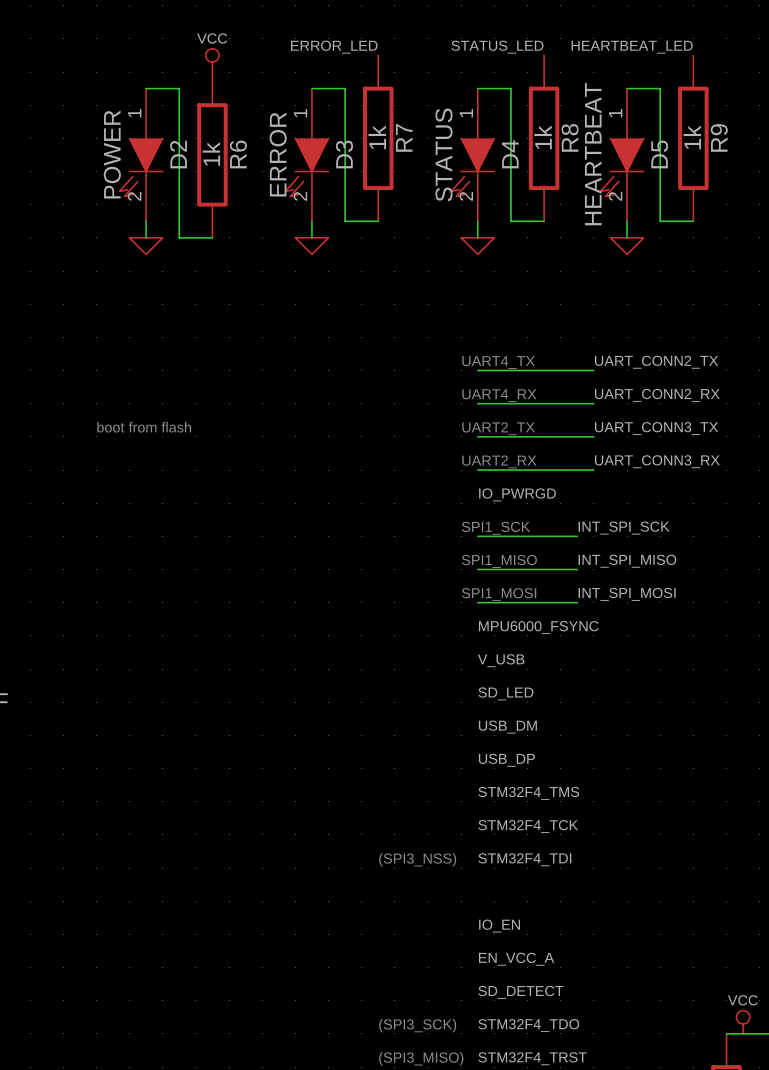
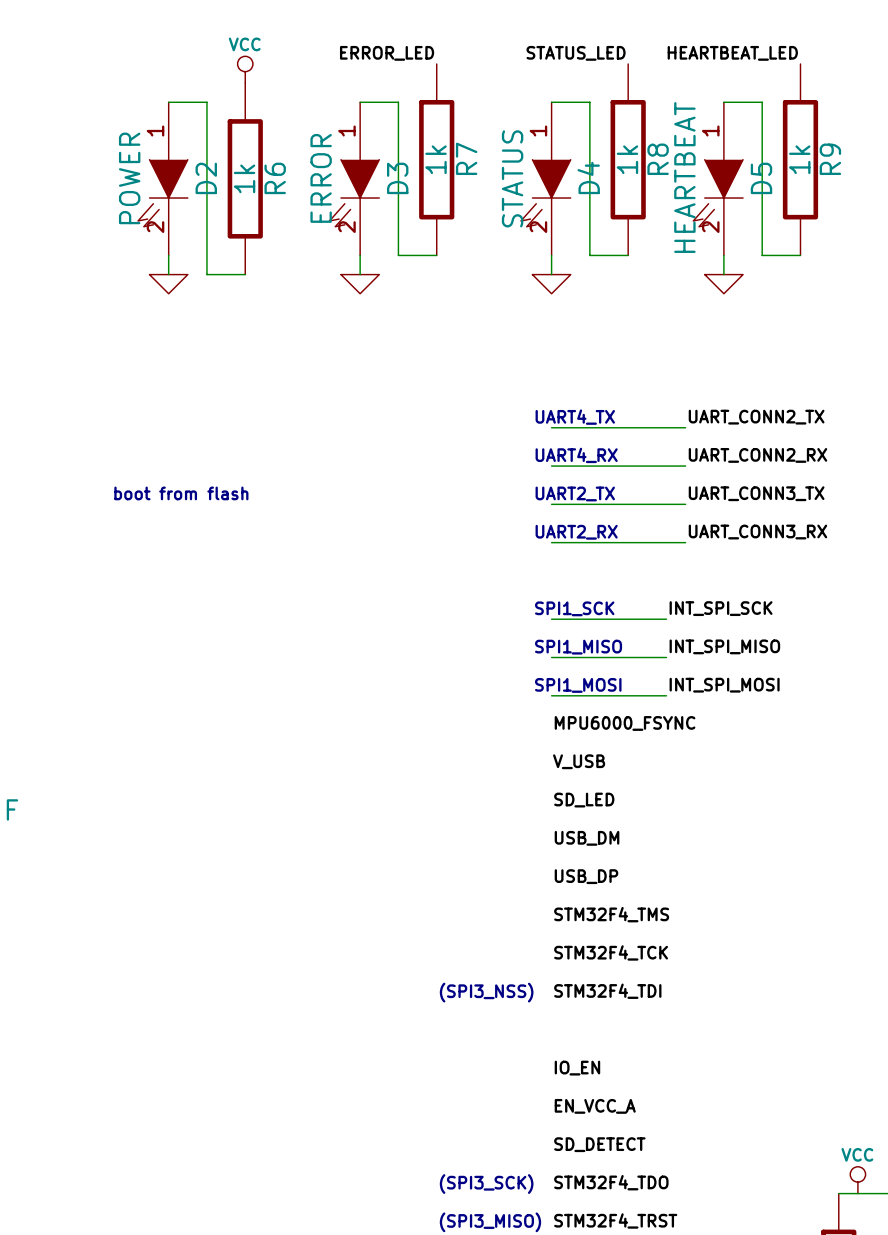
label: IO_PWRGD (517, 494) -> none

